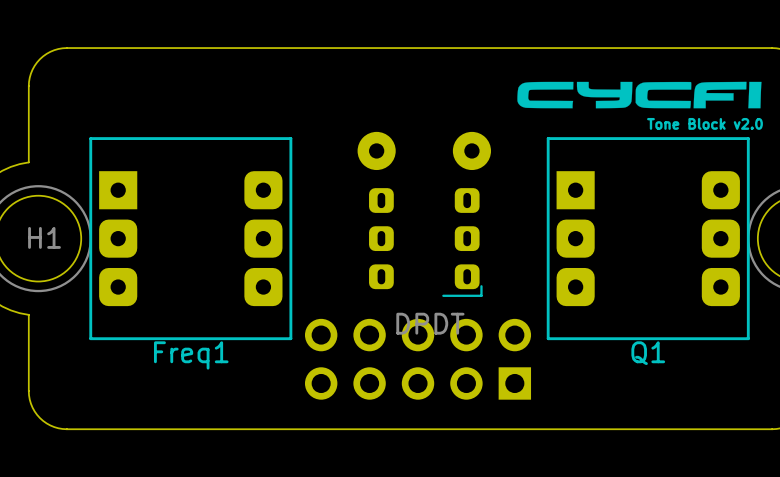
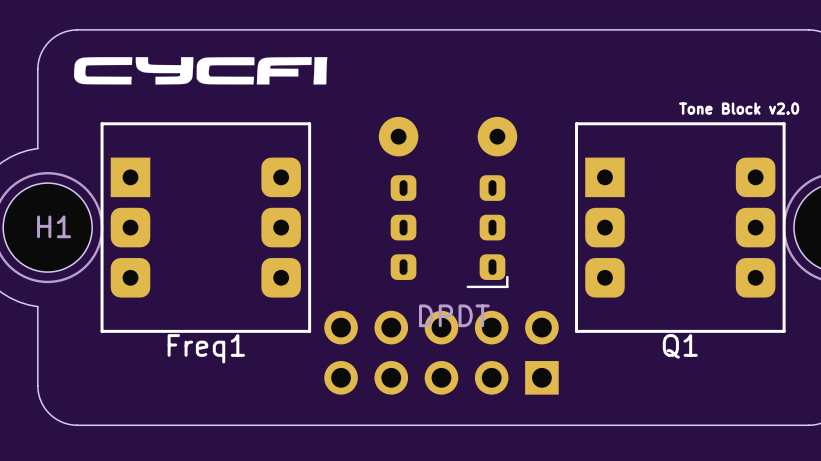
drawing position: (639, 95) -> (200, 70)

